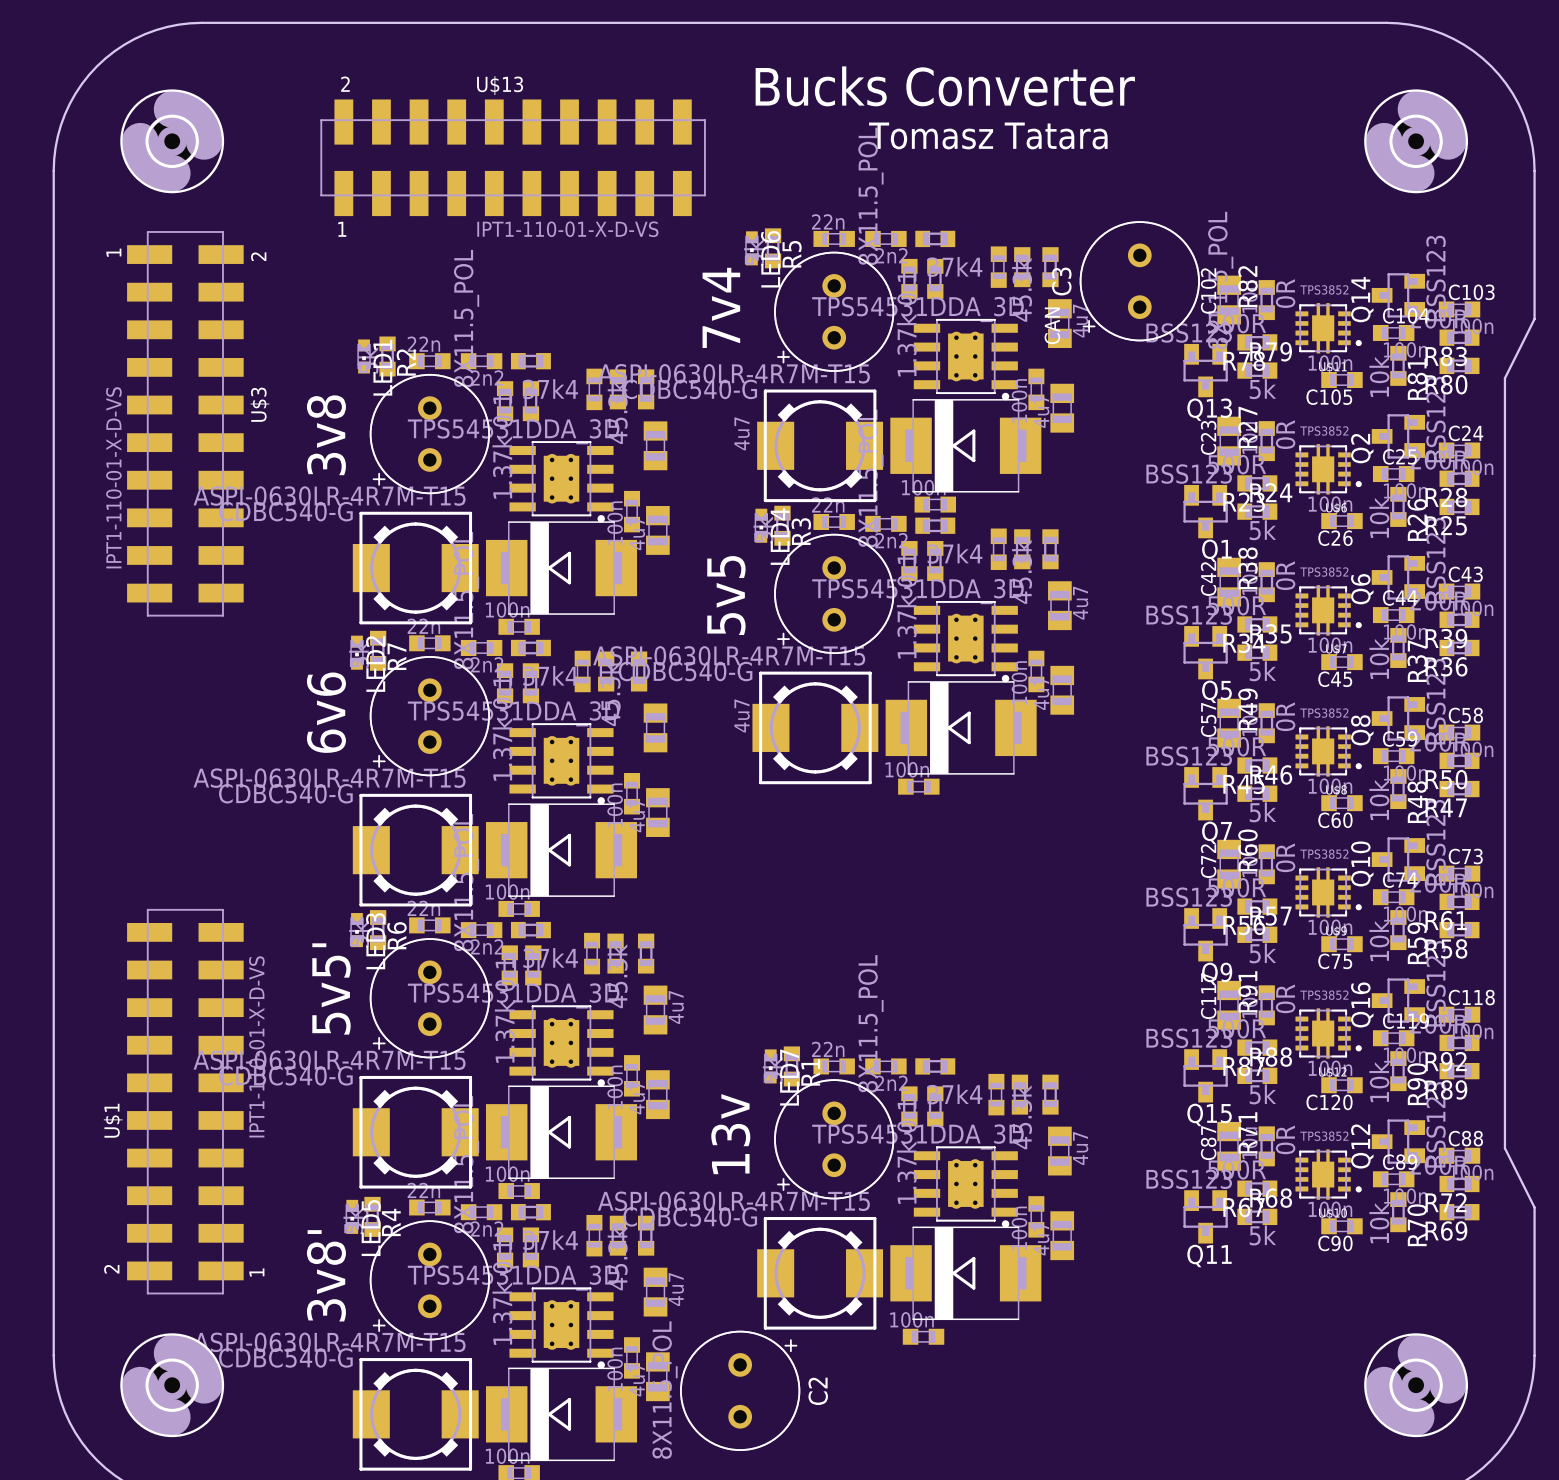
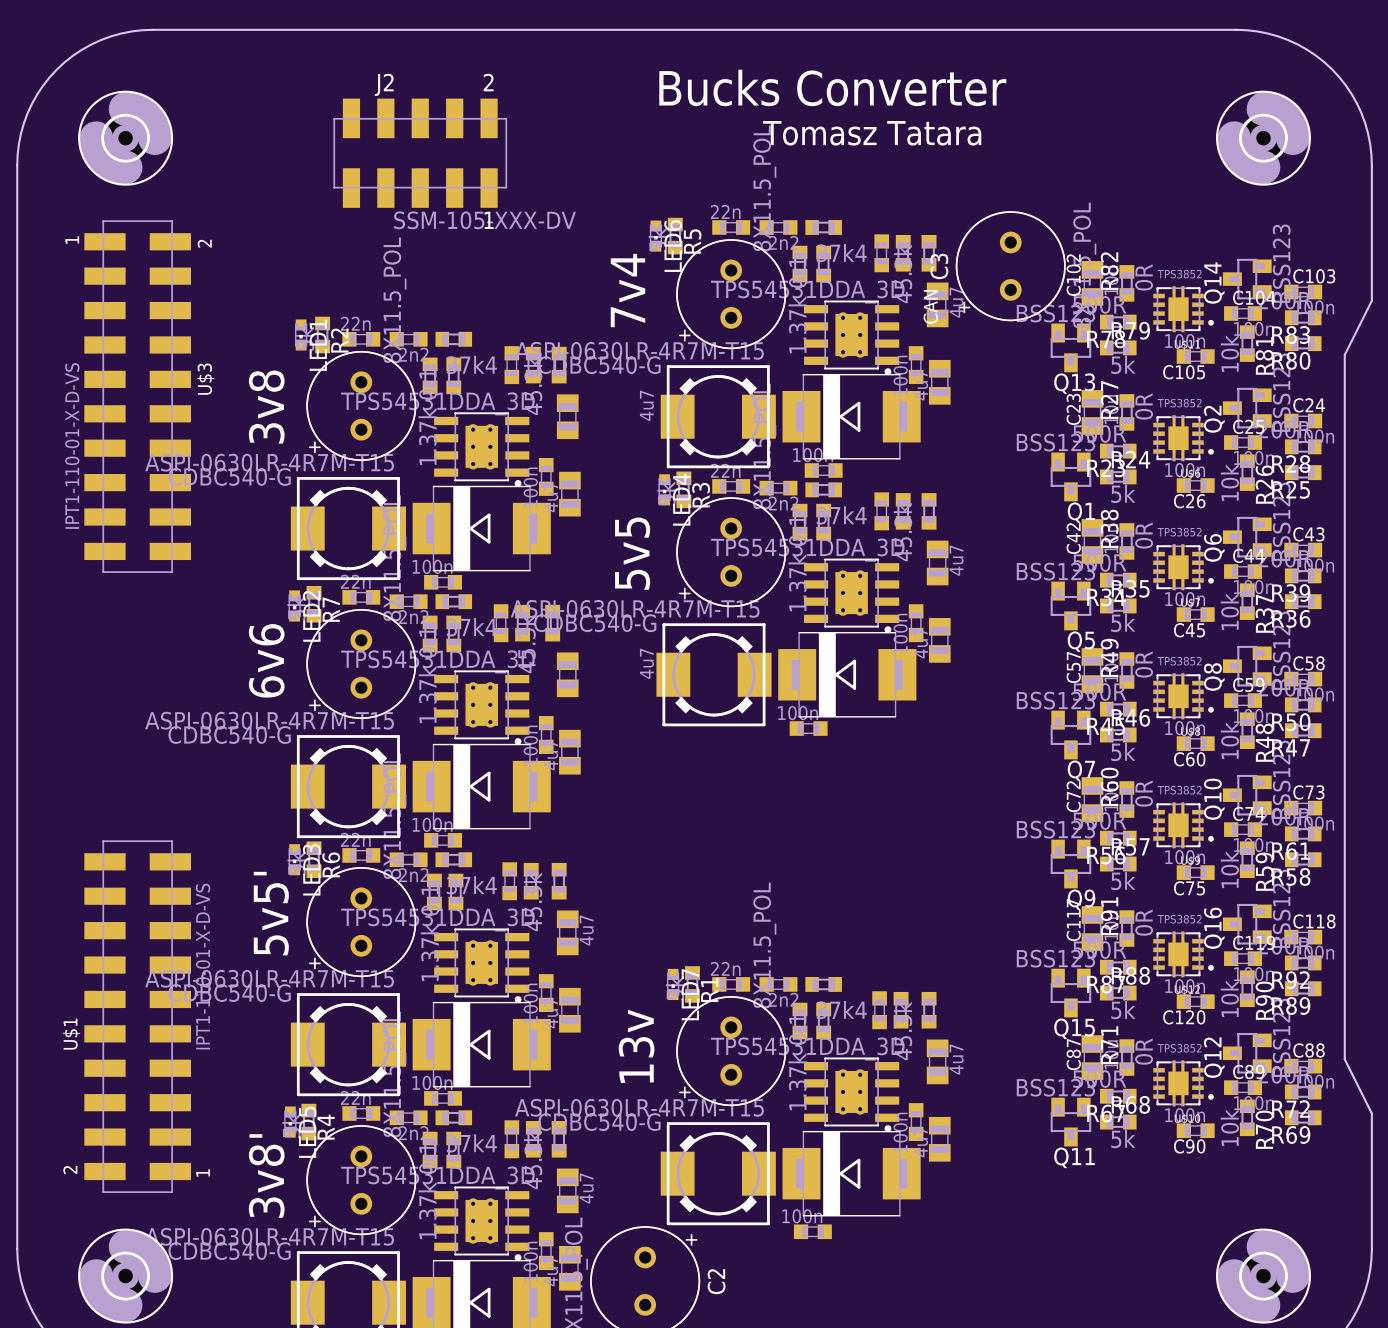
J2: none -> SSM-105-XXX-DV (420, 153)
U$13: IPT1-110-01-X-D-VS (513, 157) -> none

